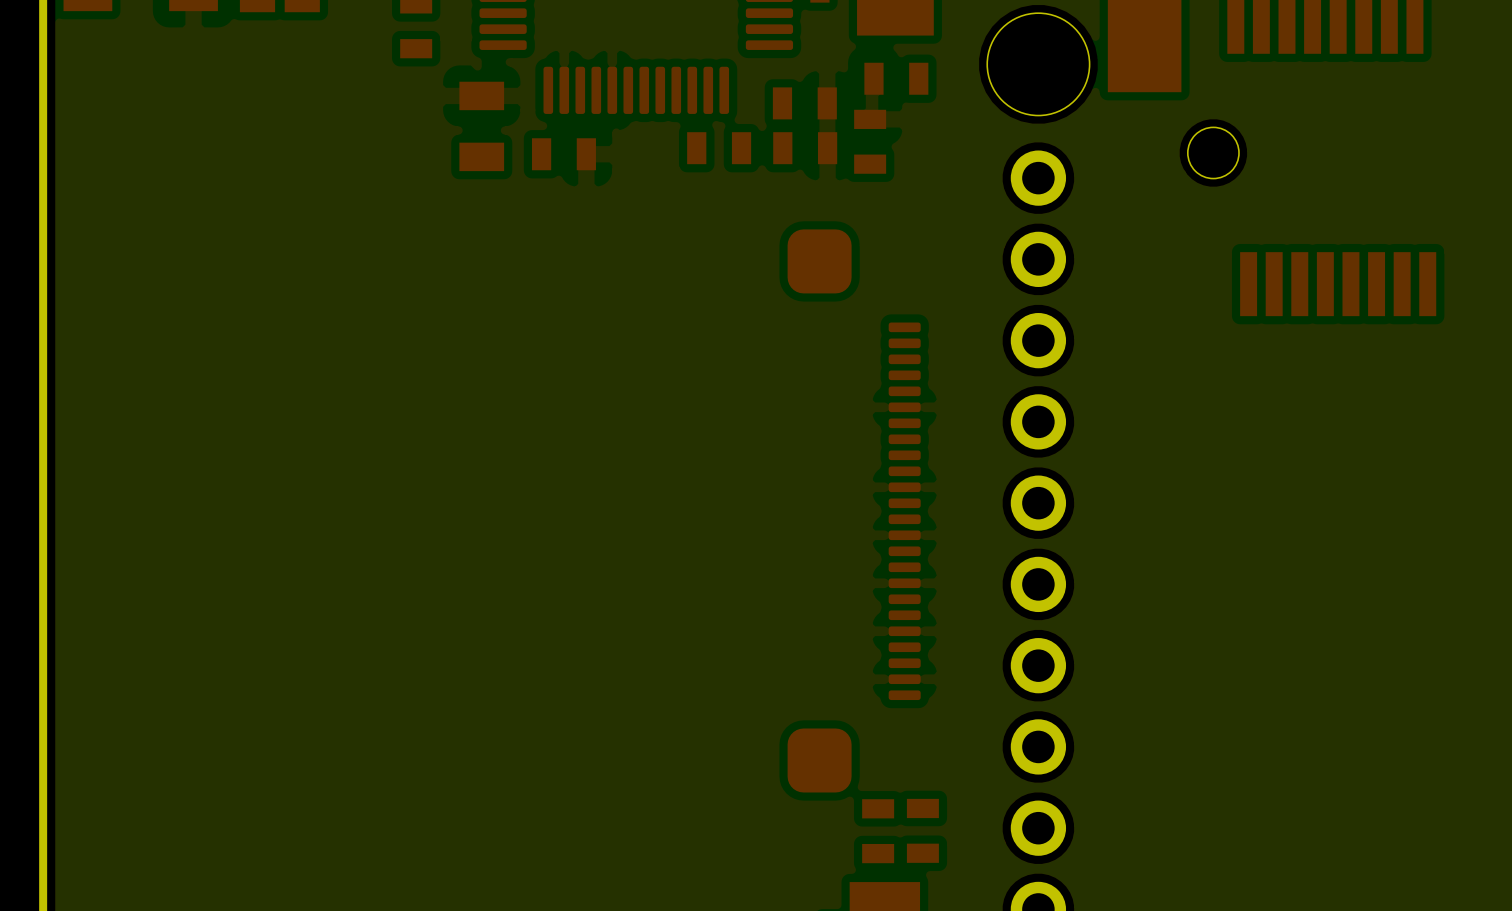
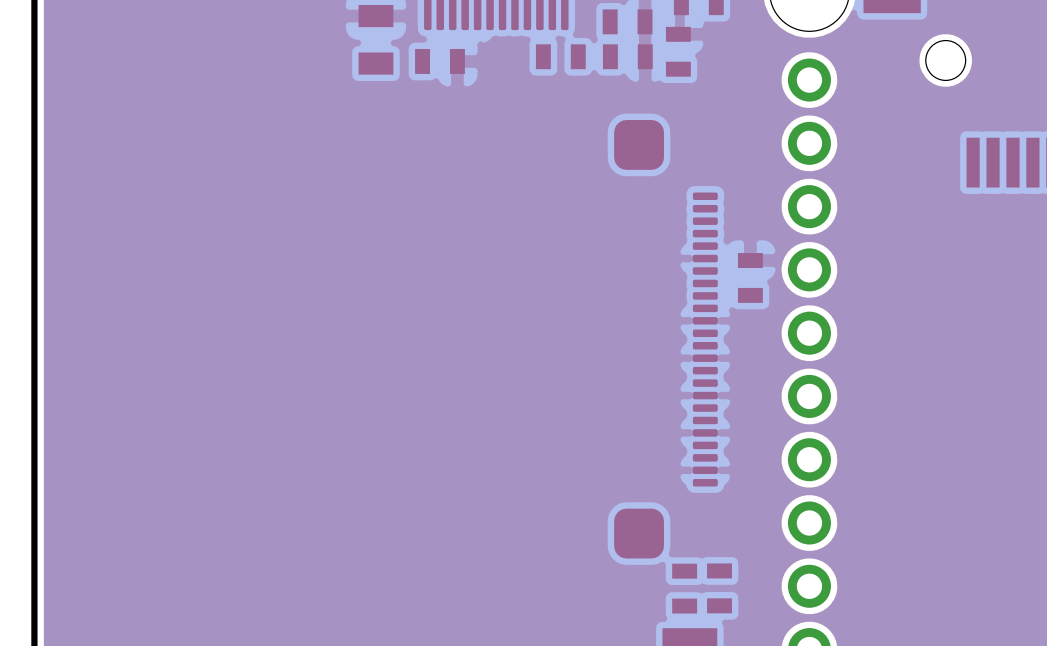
part: none -> (750, 277)

